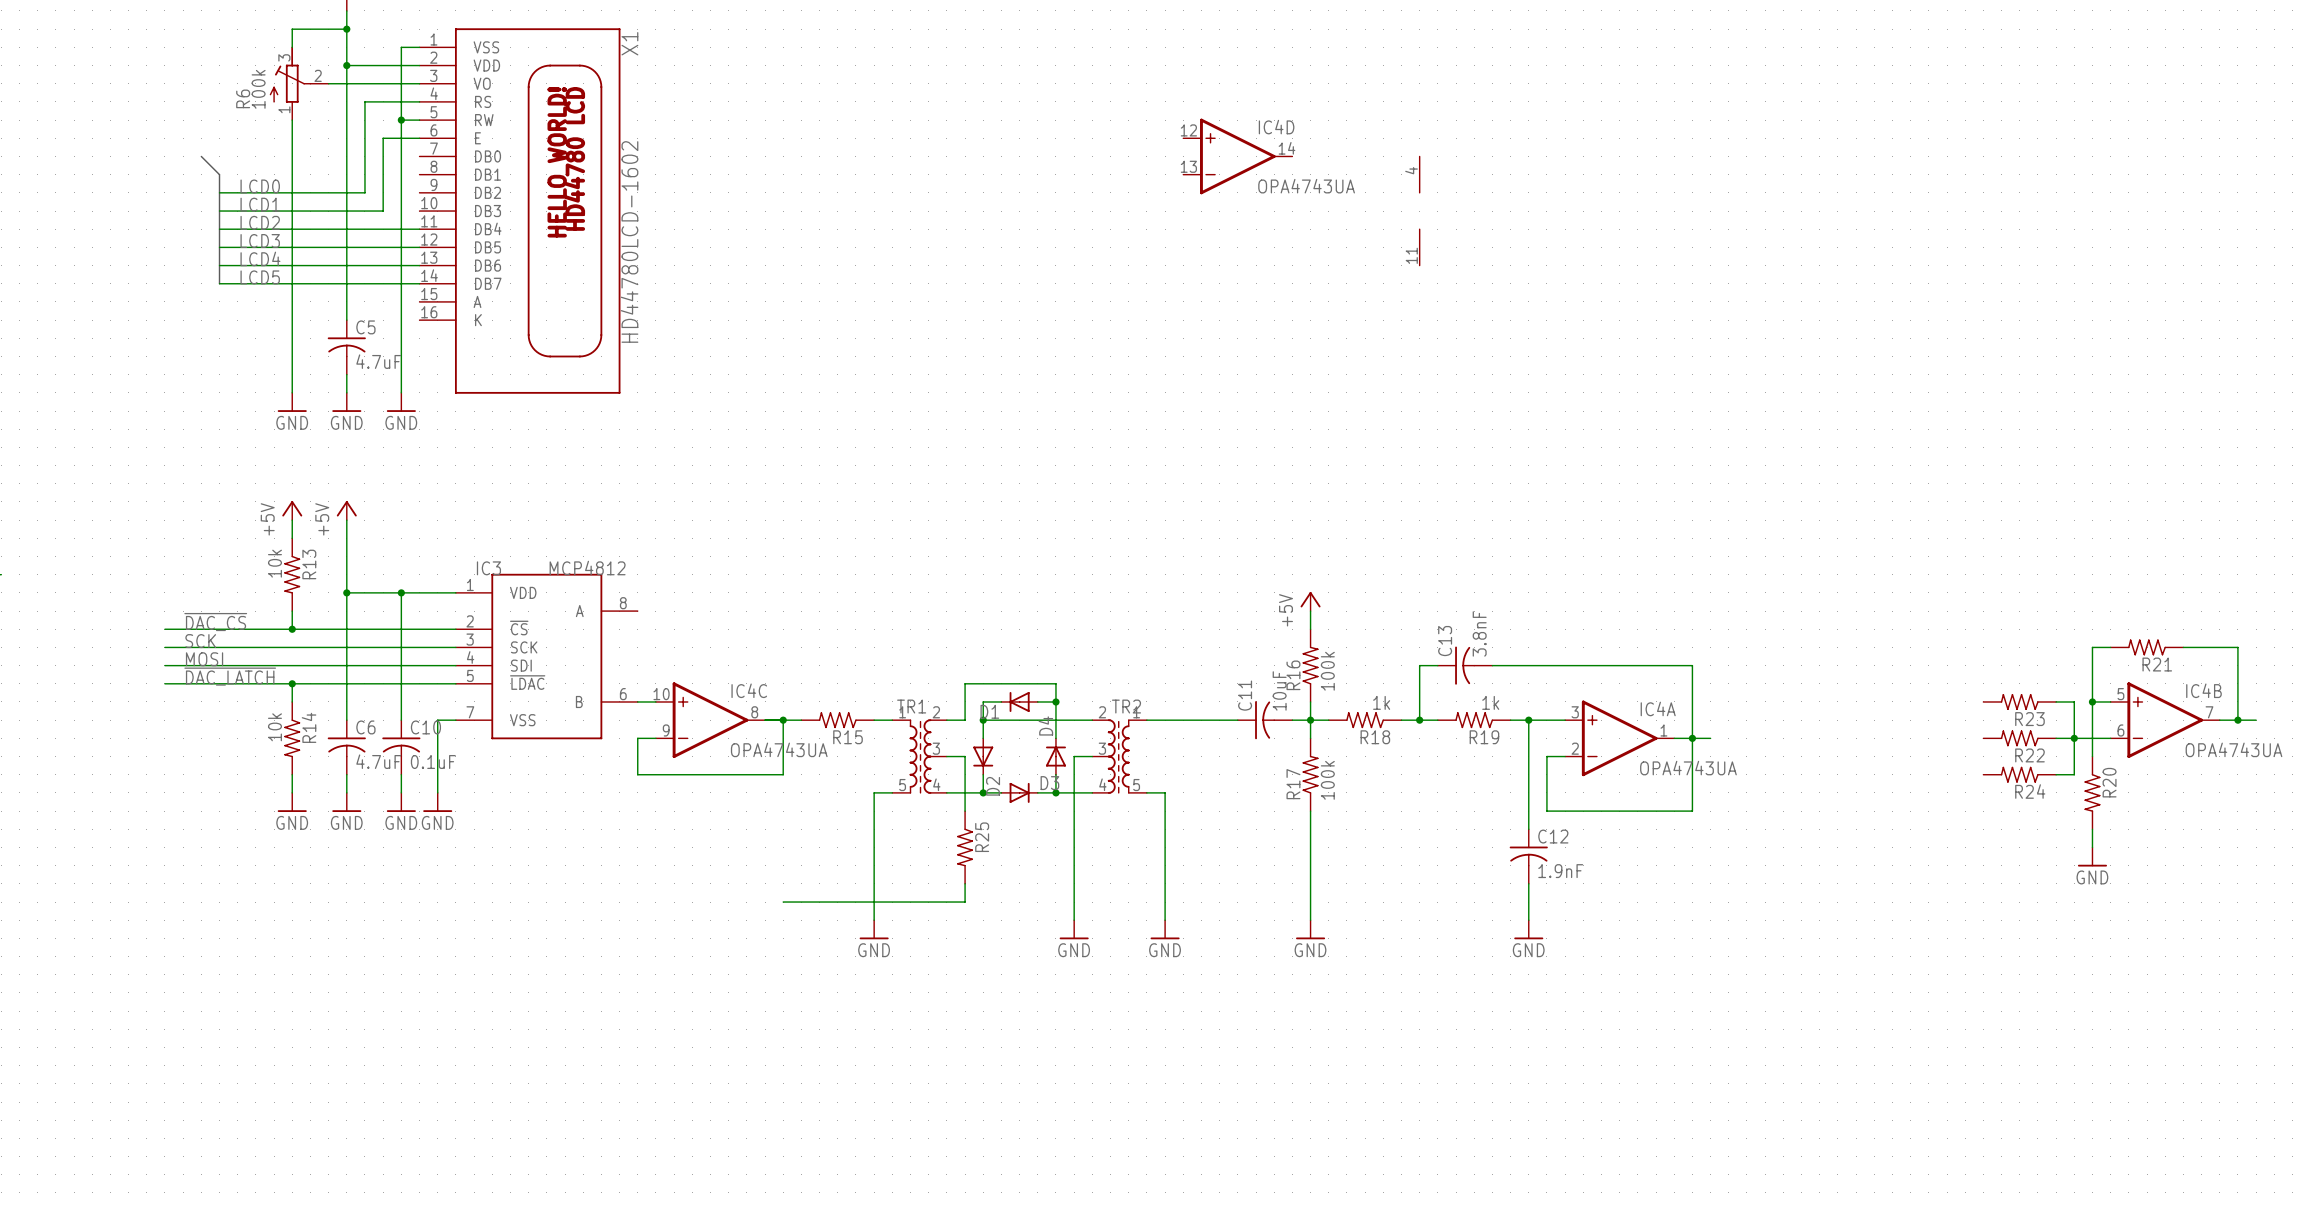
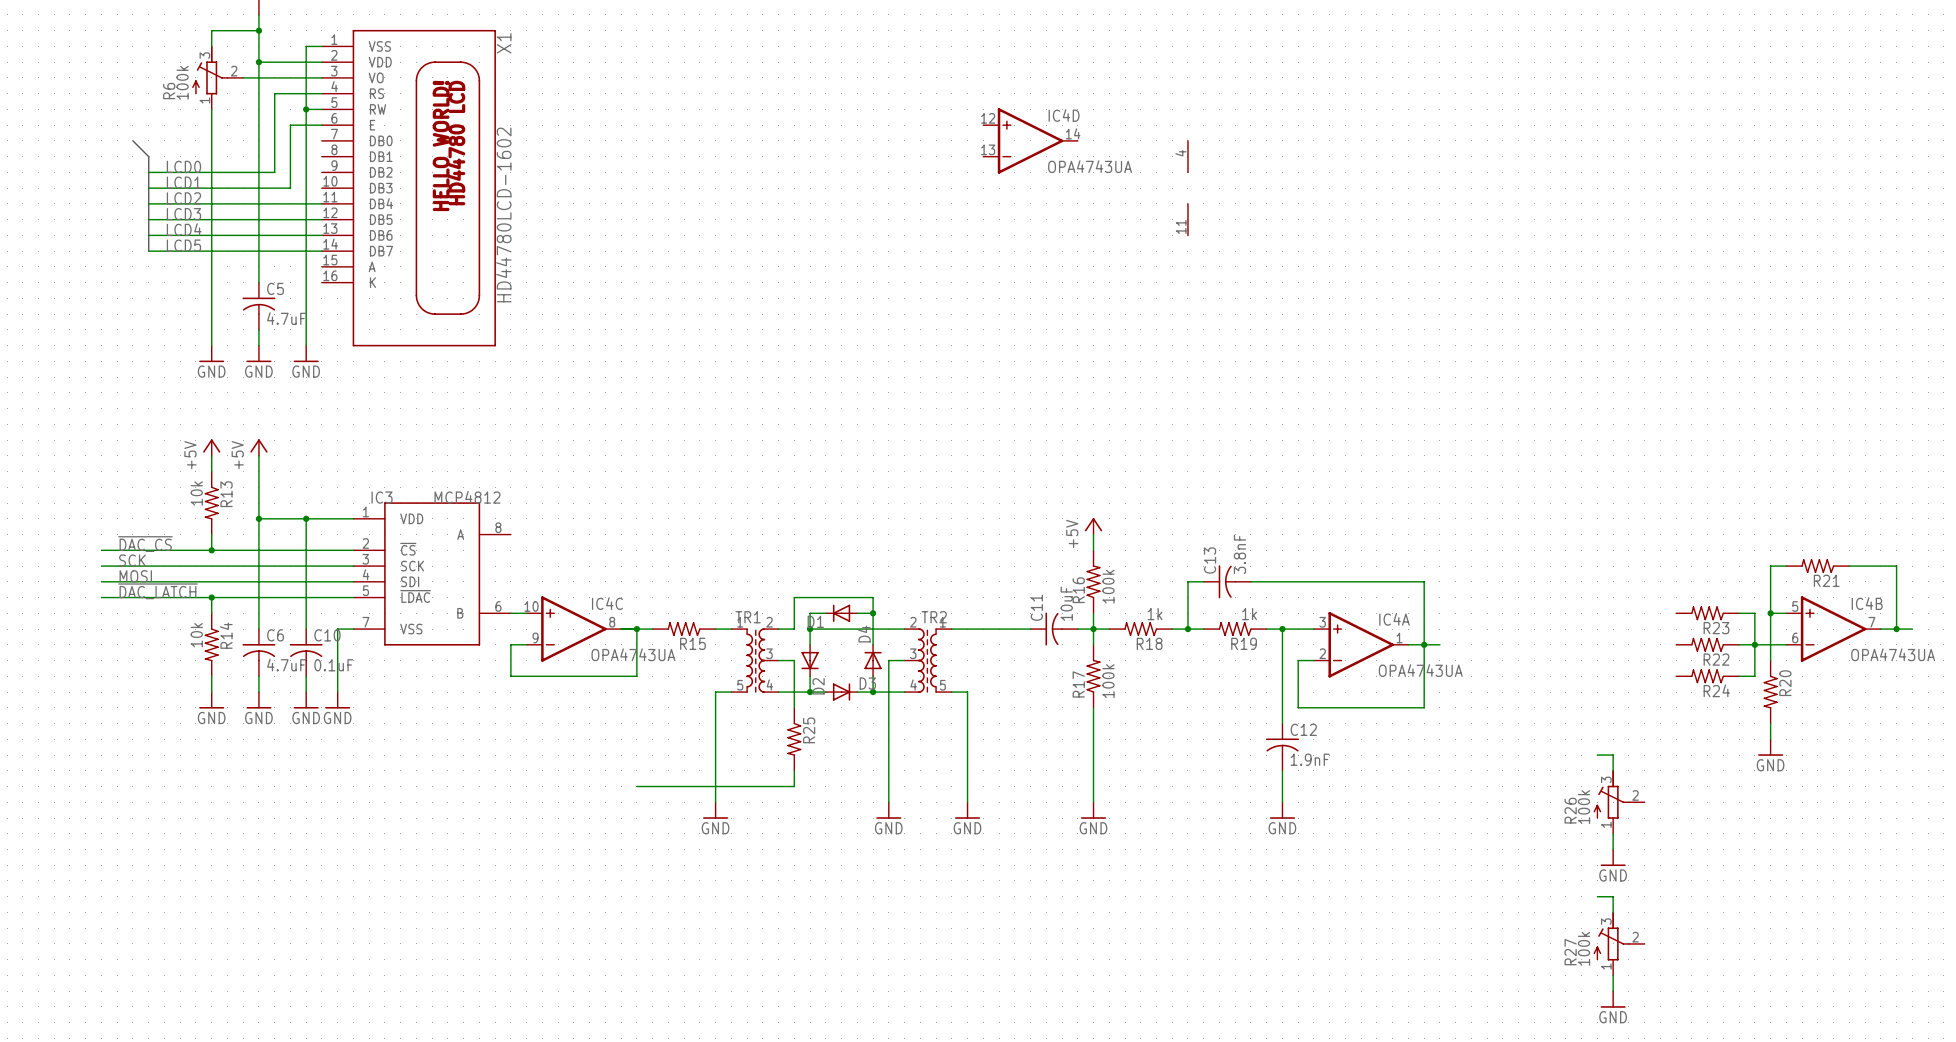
wire: none -> (1597, 755) (1613, 755) (1613, 770)
R26: none -> 100k (1619, 802)
wire: none -> (1613, 833) (1613, 849)
power symbol: none -> GND (1613, 857)
wire: none -> (1597, 896) (1613, 896) (1613, 912)
R27: none -> 100k (1619, 943)
wire: none -> (1613, 975) (1613, 991)
power symbol: none -> GND (1613, 999)

